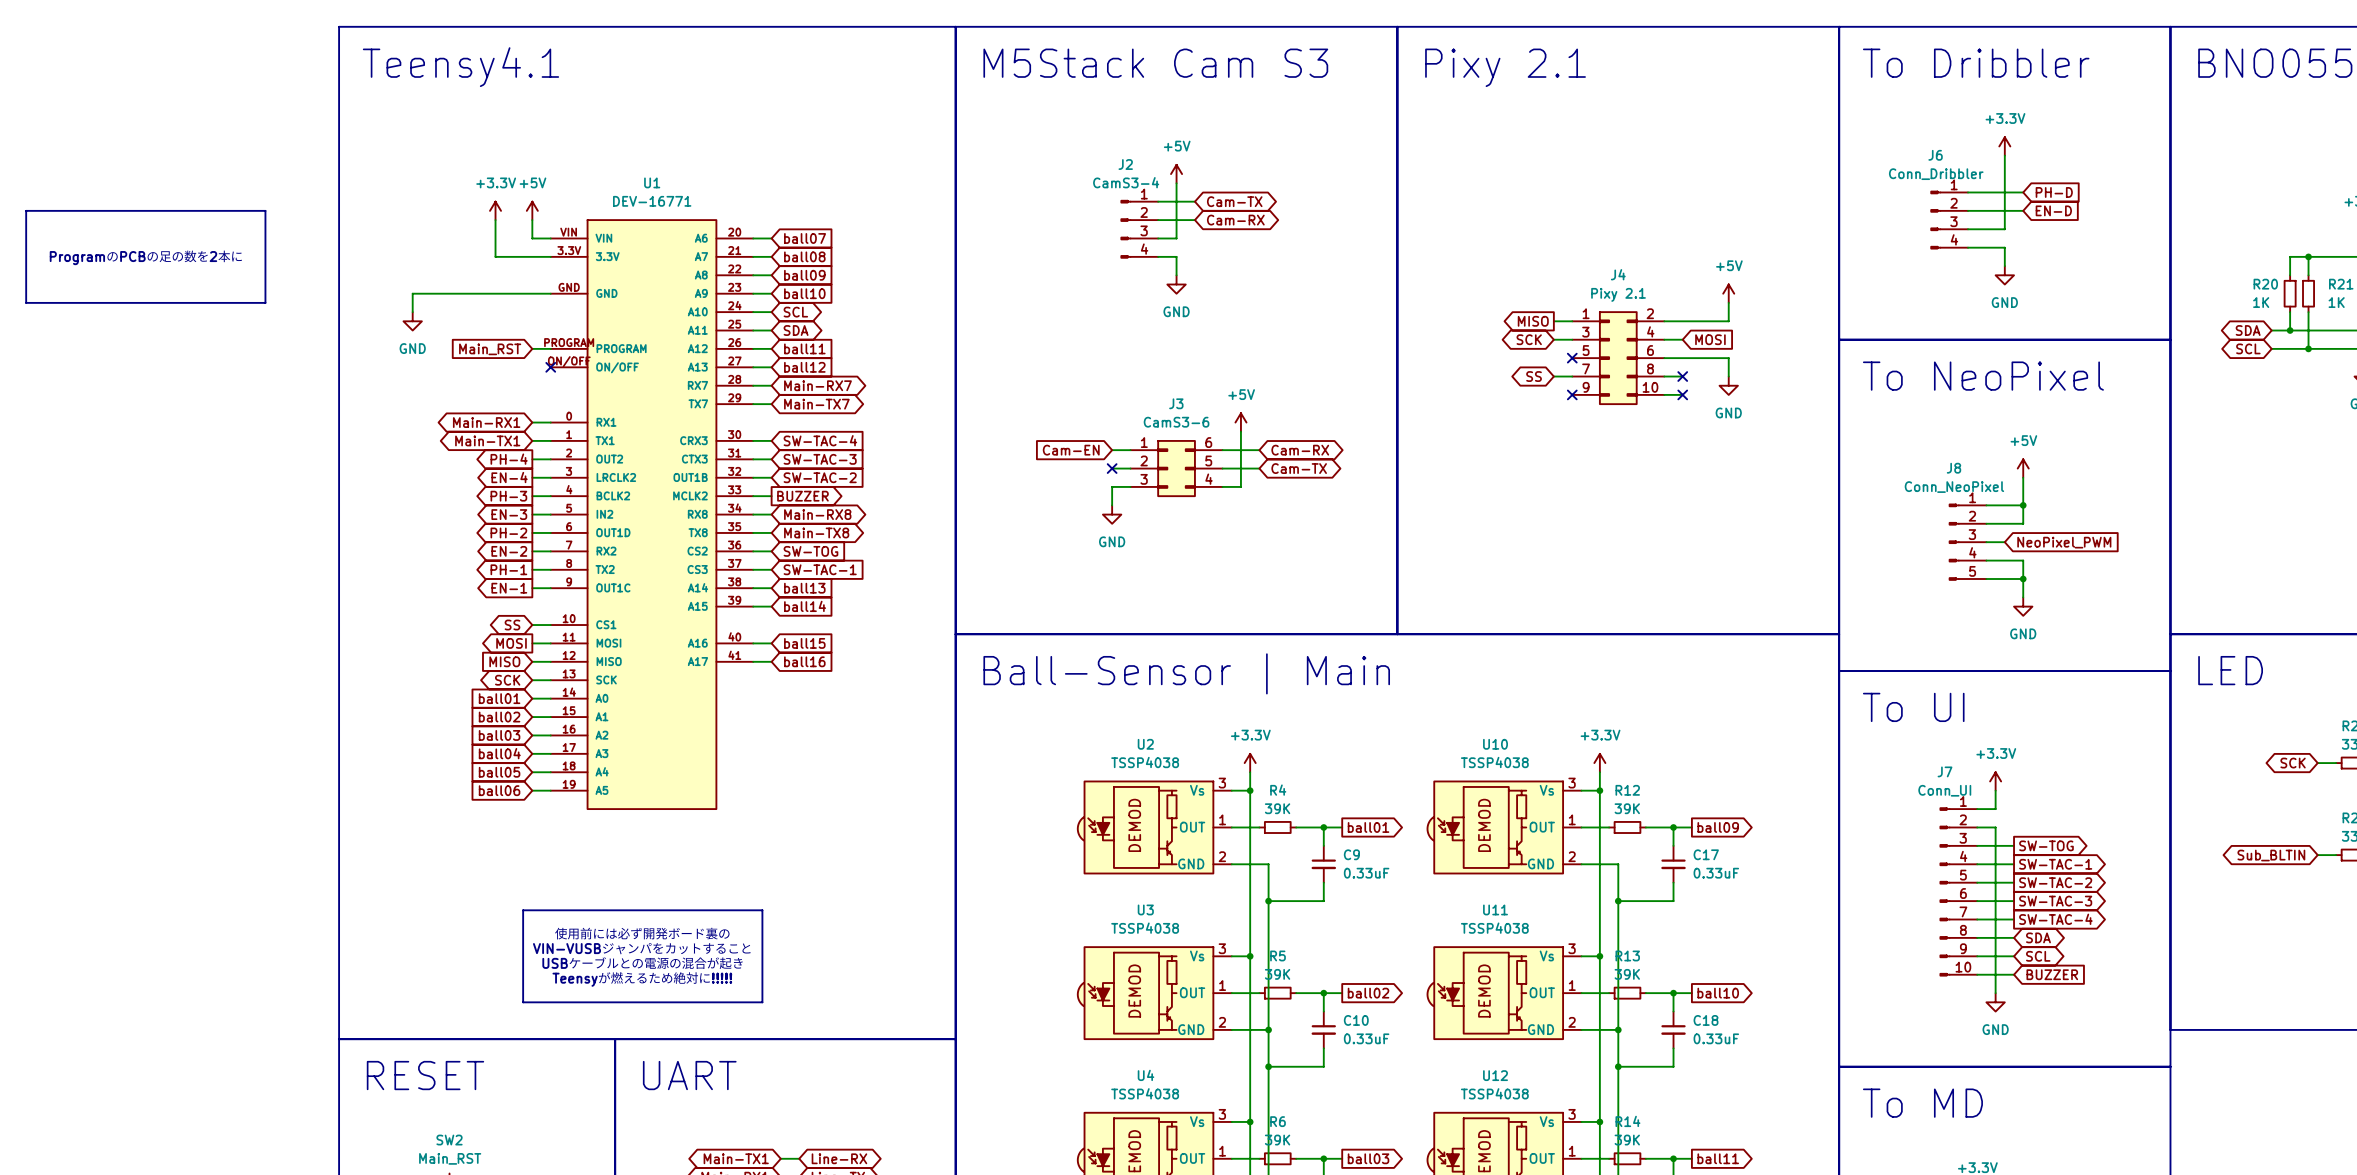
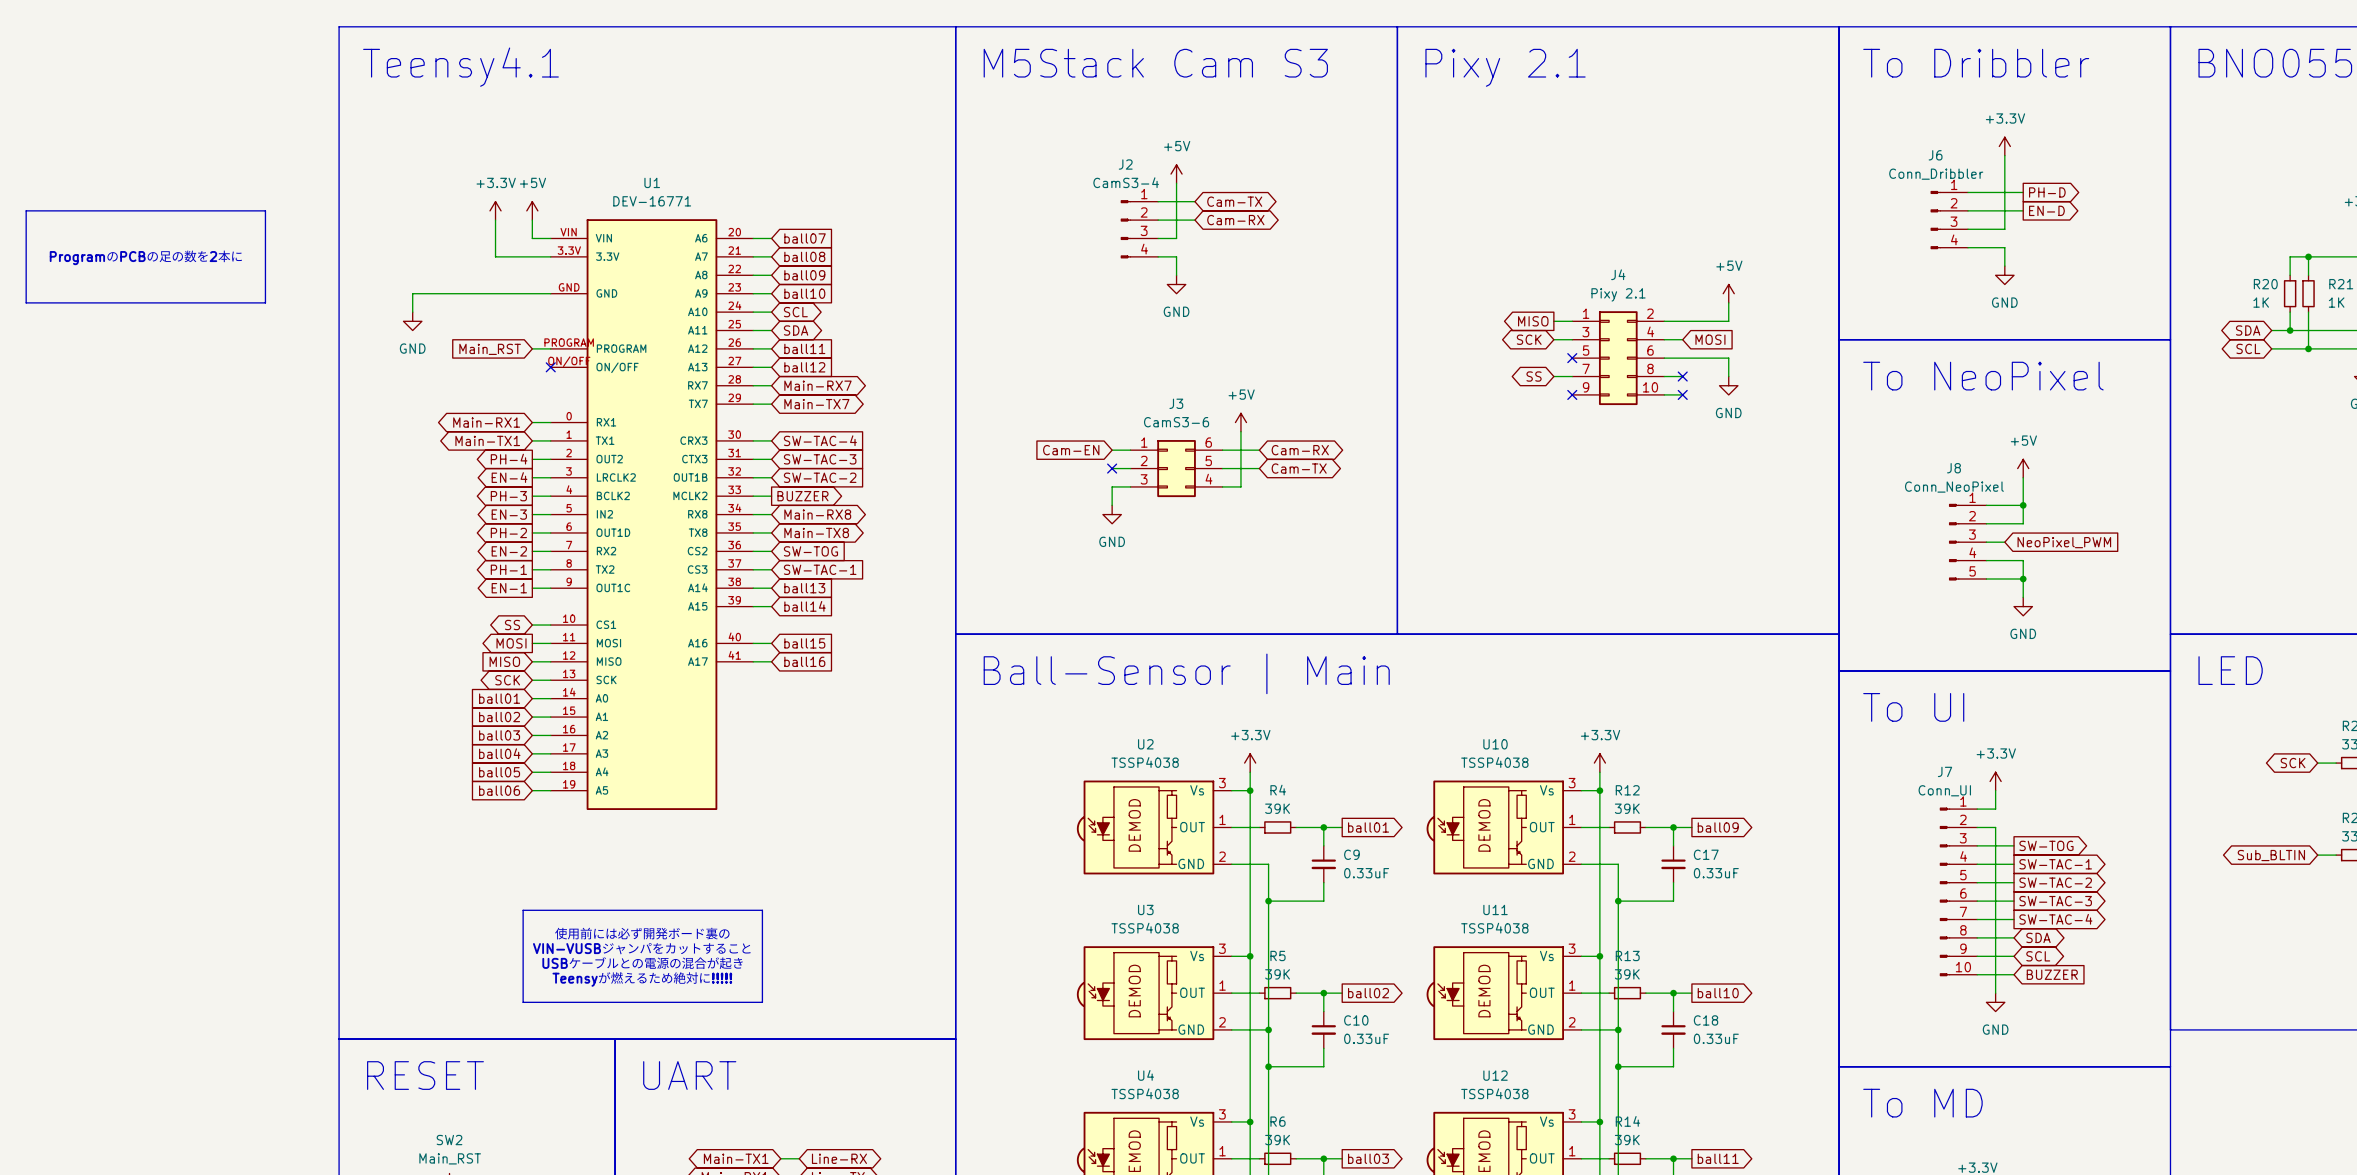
global label shape: input (2054, 192) -> output (2047, 192)
global label shape: input (2053, 210) -> output (2046, 210)

